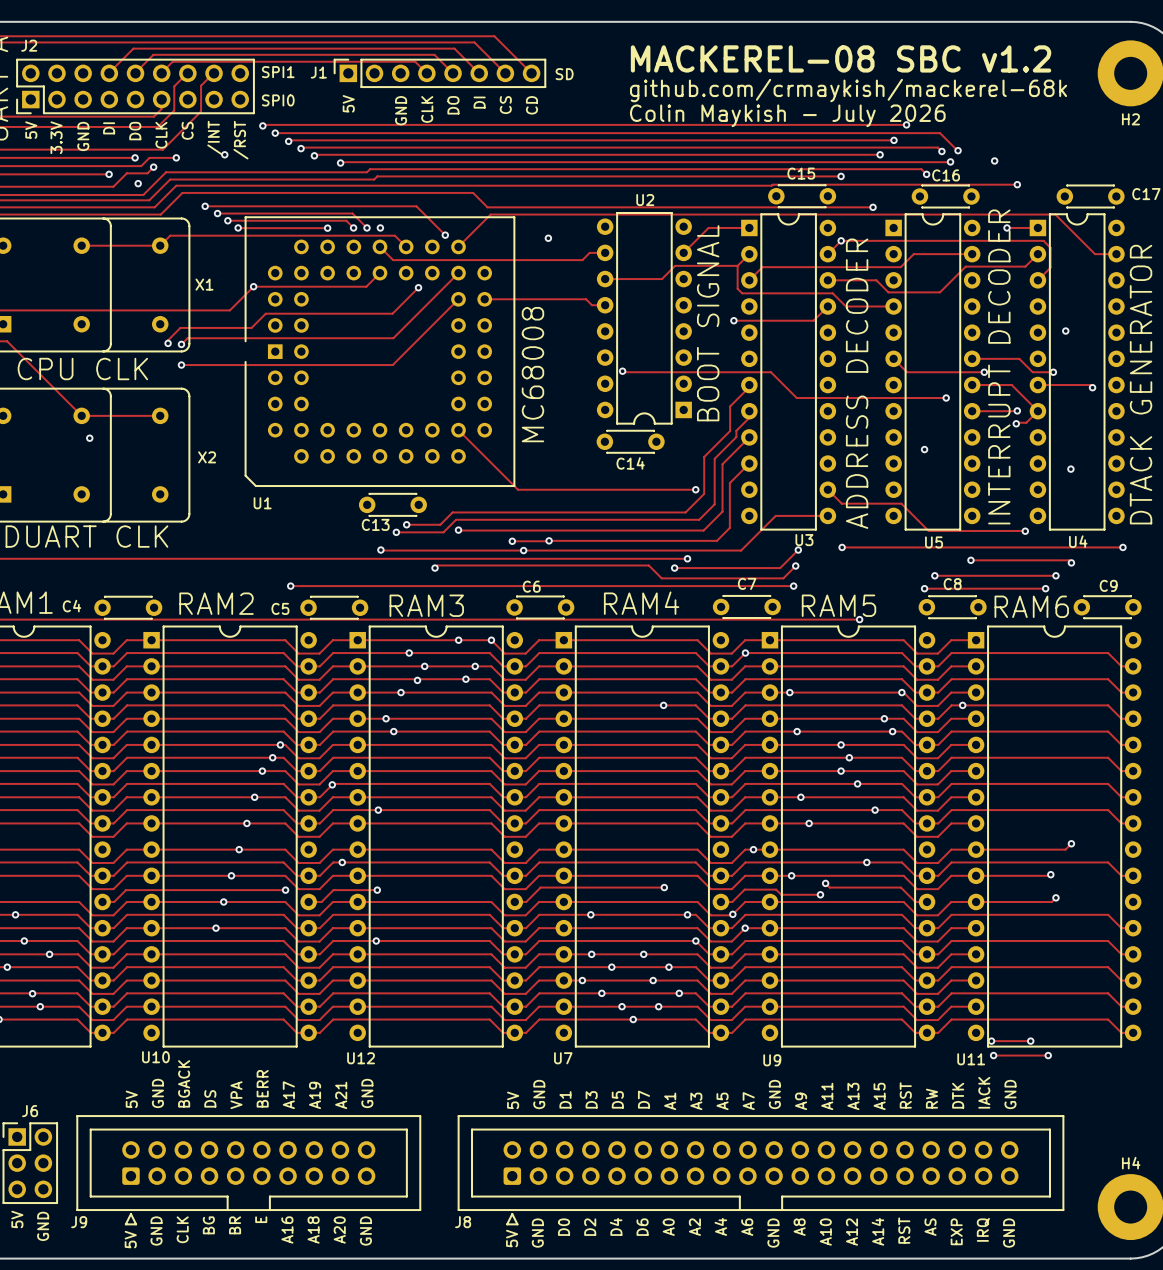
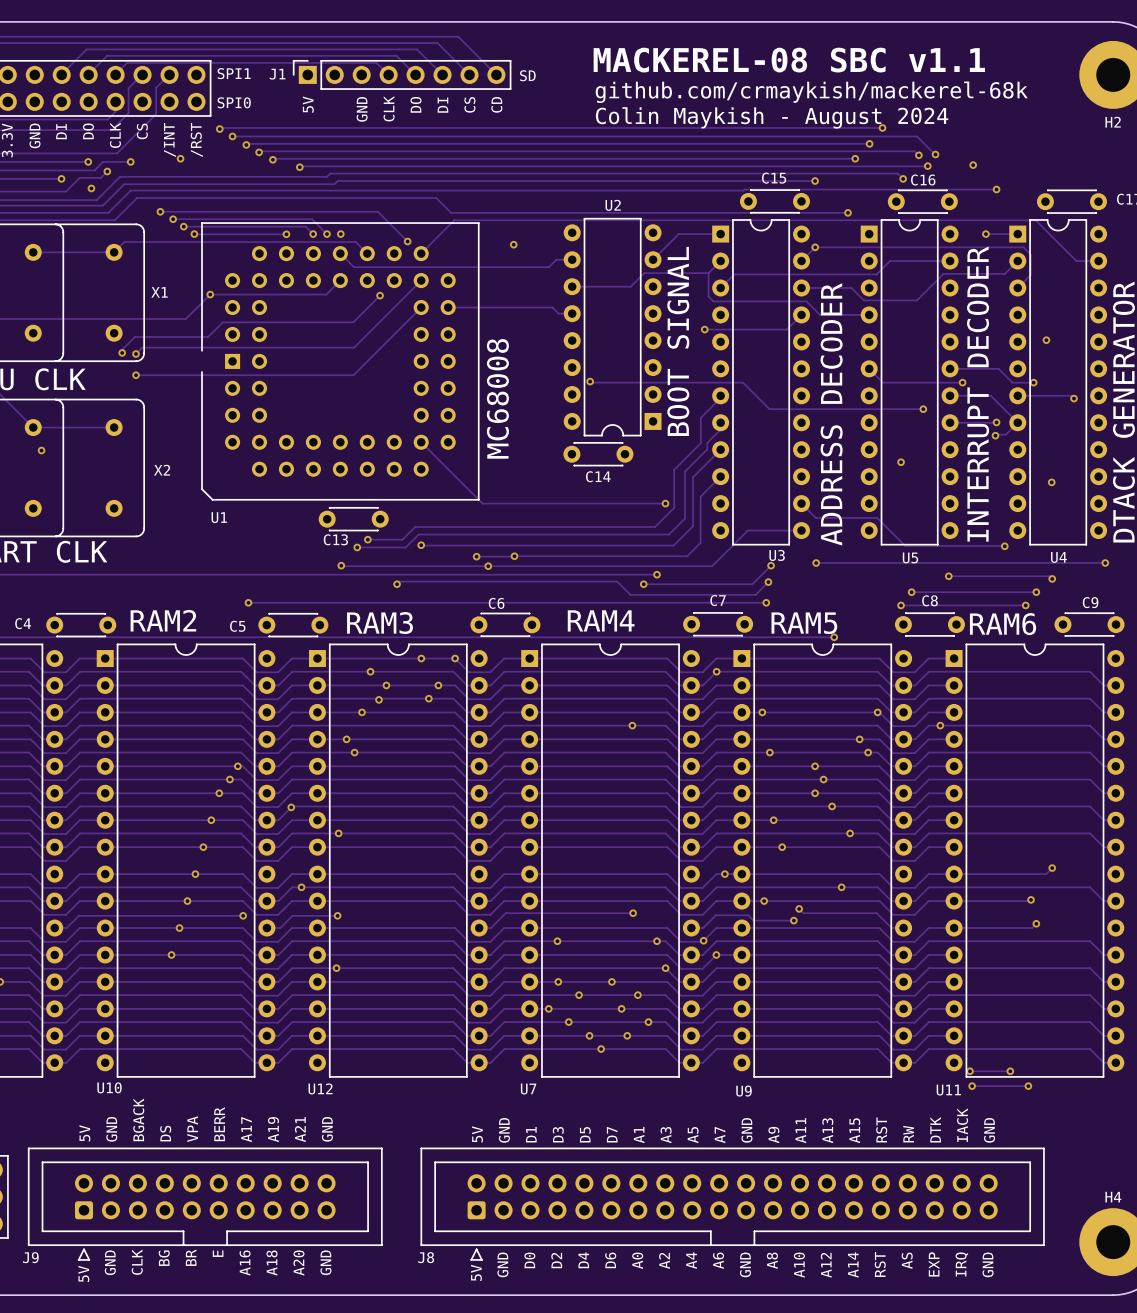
text: MACKEREL-08 SBC v1.2 (841, 58) -> MACKEREL-08 SBC v1.1 (789, 60)
text: Colin Maykish - July 2026 (787, 115) -> Colin Maykish - August 2024 (772, 117)

